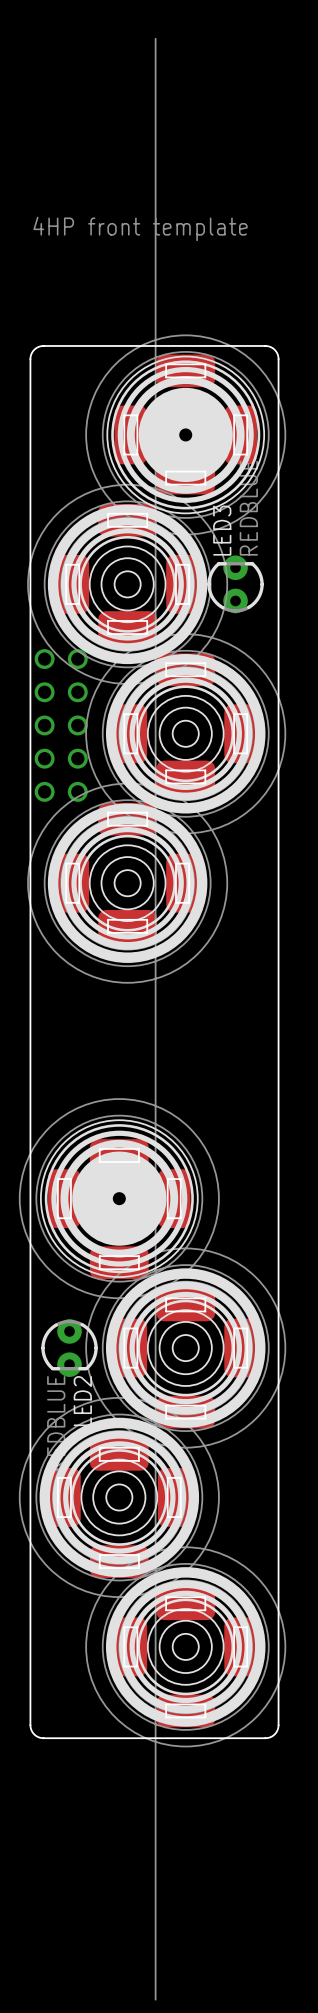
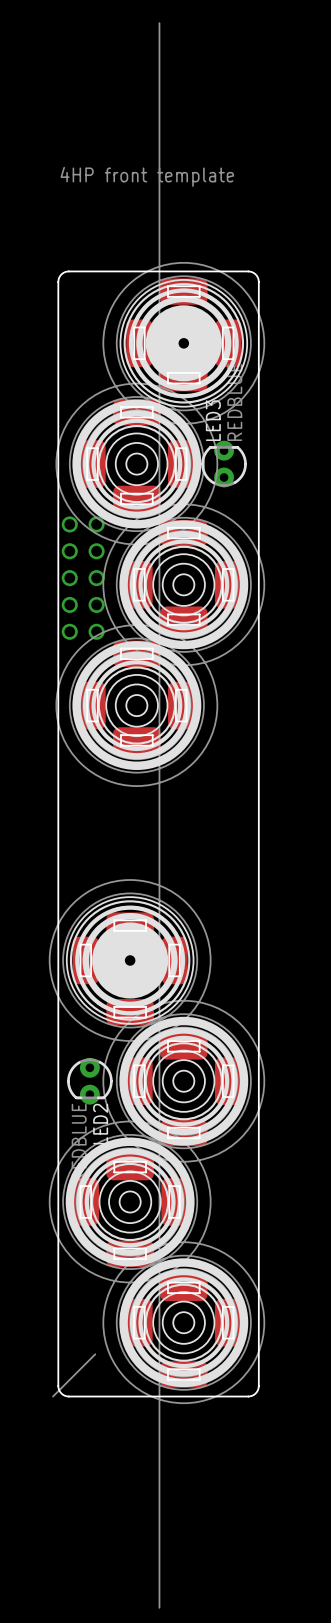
drawing shape: [29, 38, 280, 2000] -> [52, 23, 260, 1608]

